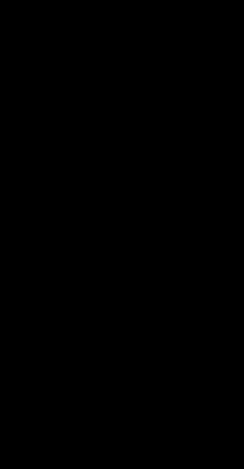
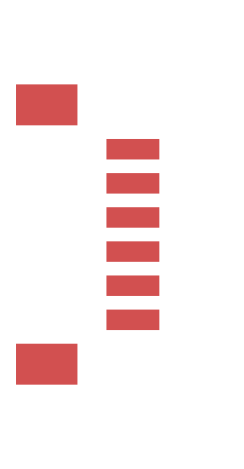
part: none -> (87, 234)

